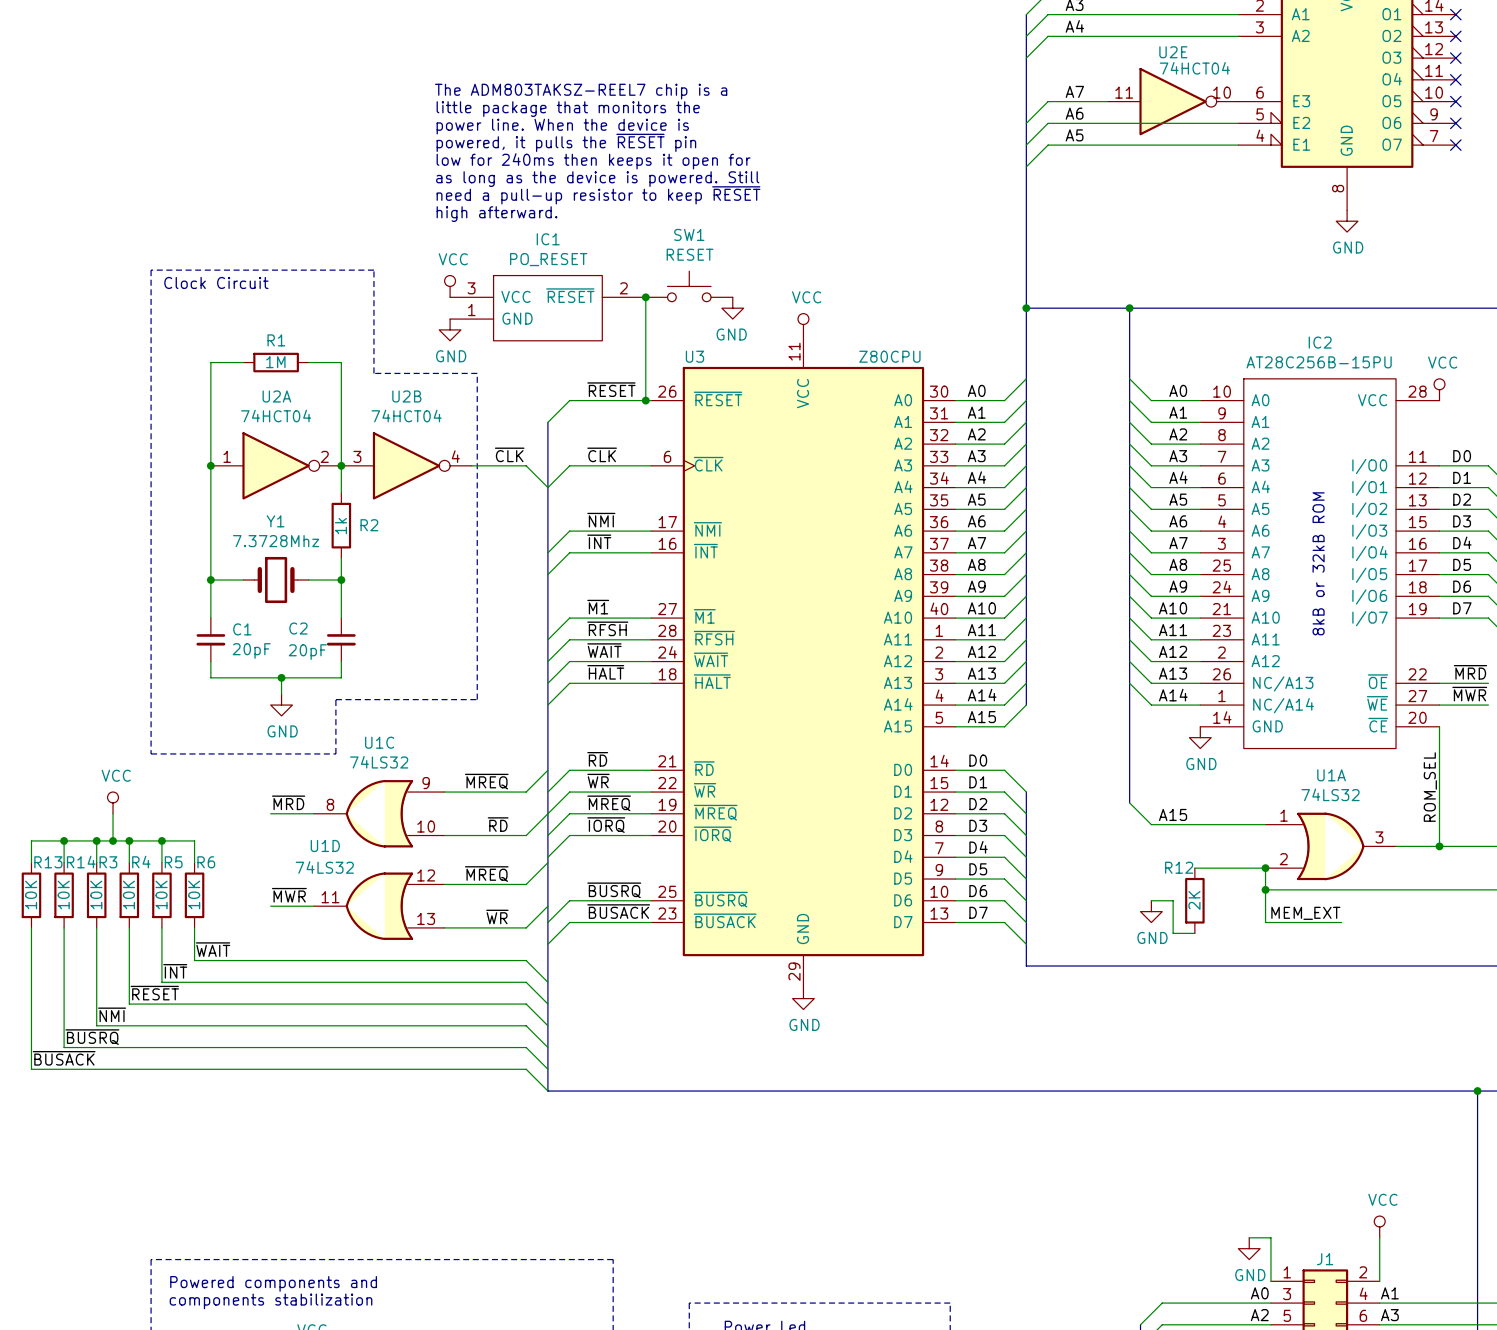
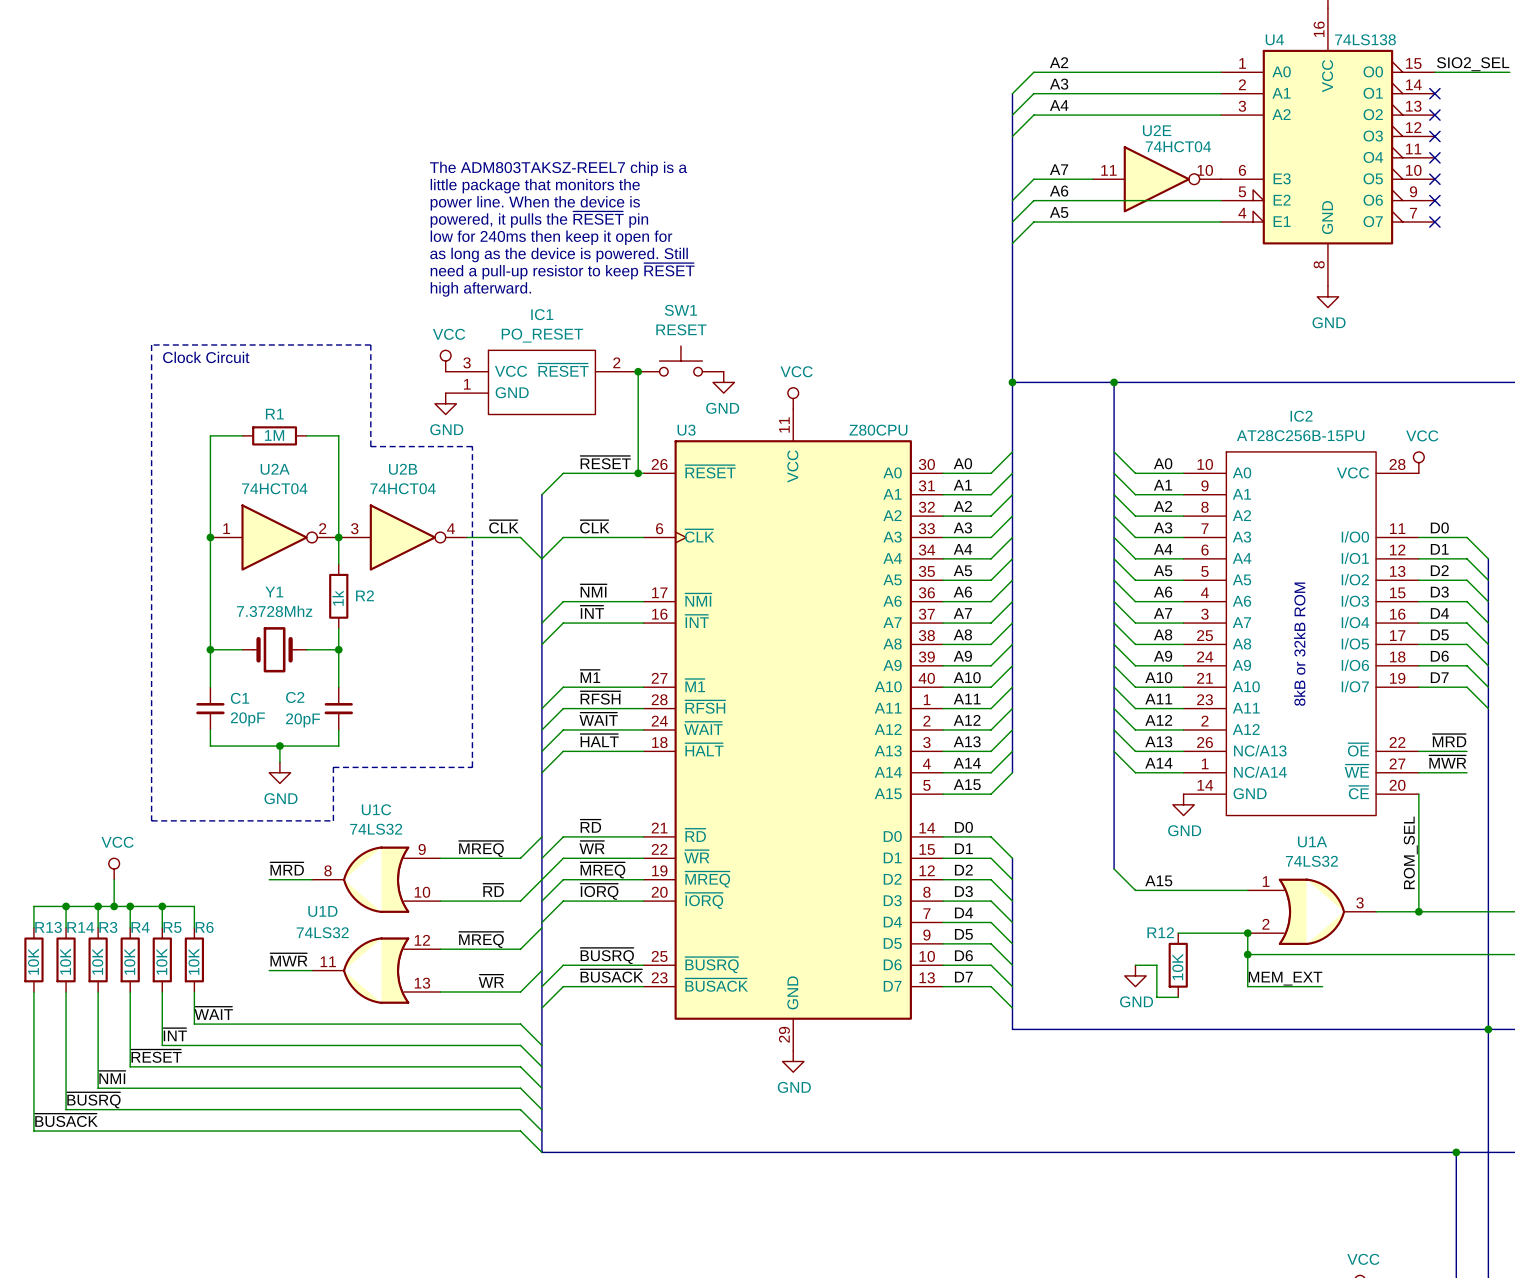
text: low for 240ms then keeps it open for (593, 161) -> low for 240ms then keep it open for (551, 237)
R12 value: 2K (1194, 900) -> 10K (1177, 966)

